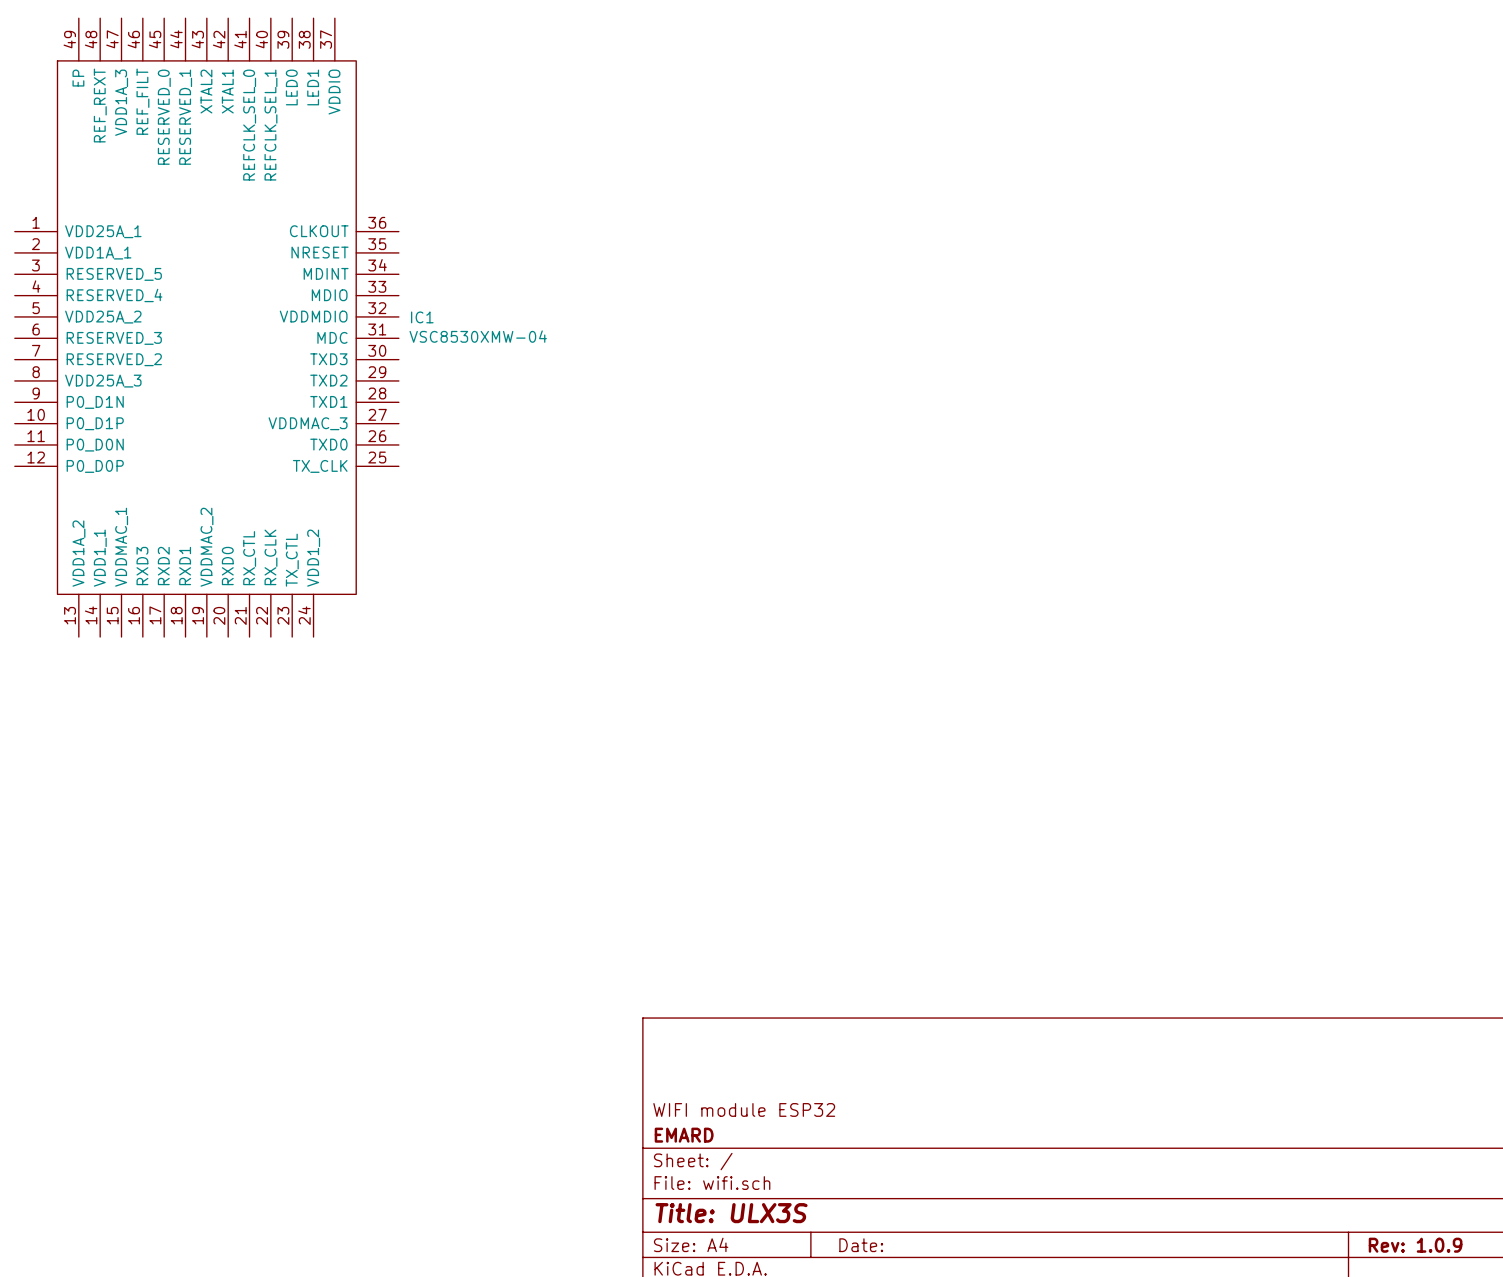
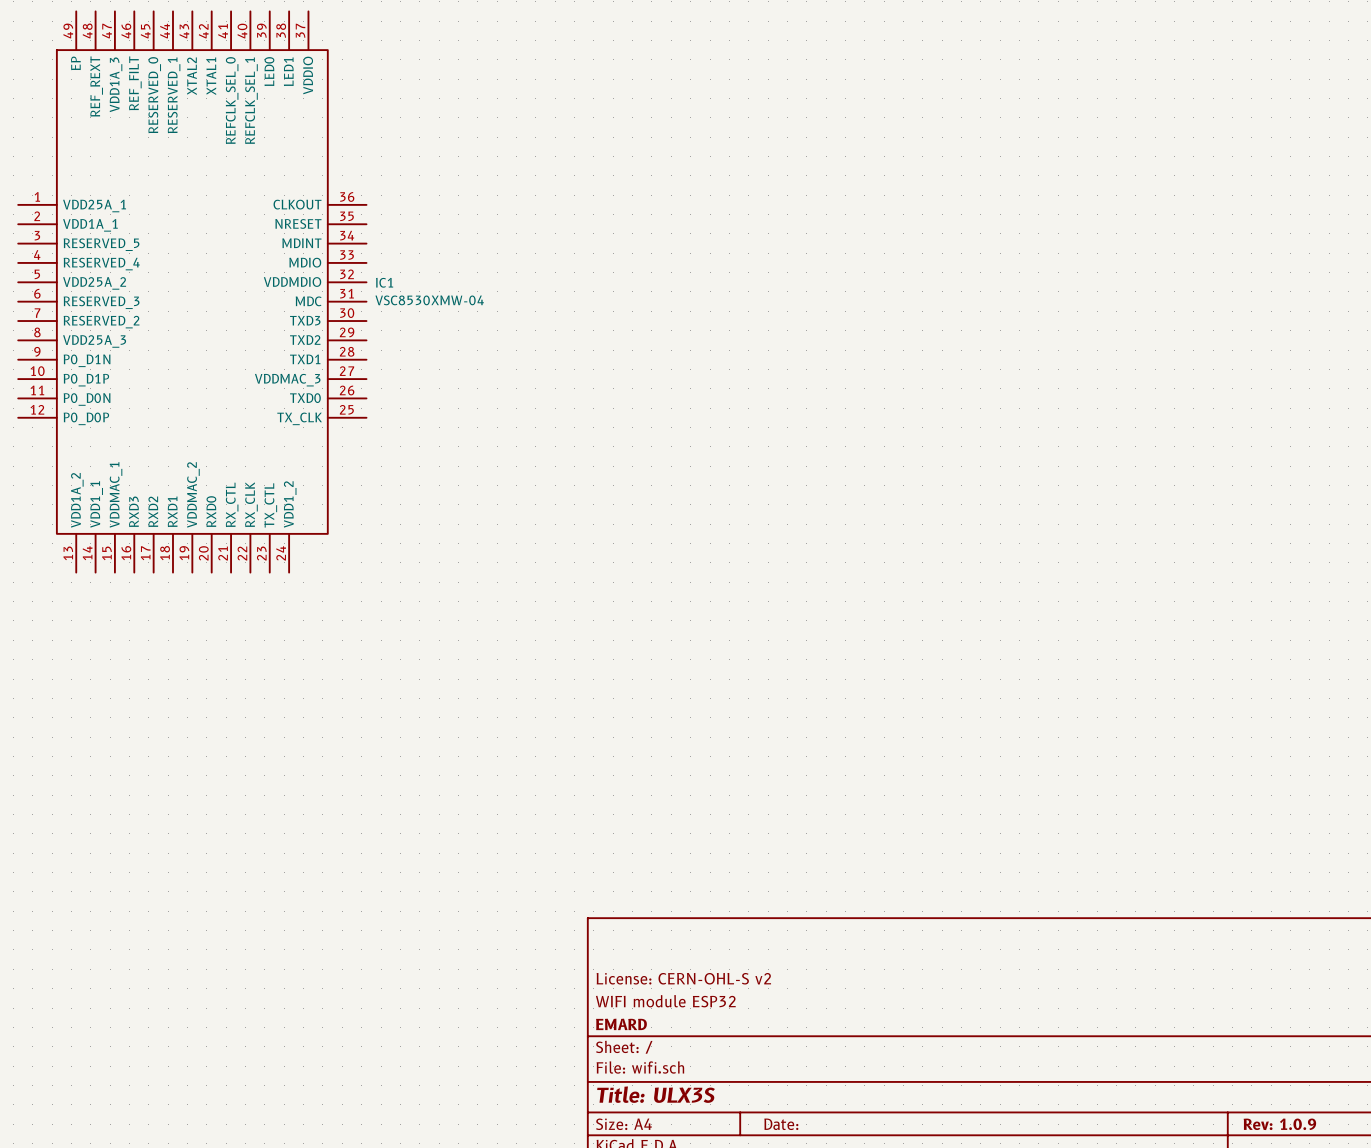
title block: none -> License: CERN-OHL-S v2 (683, 978)

